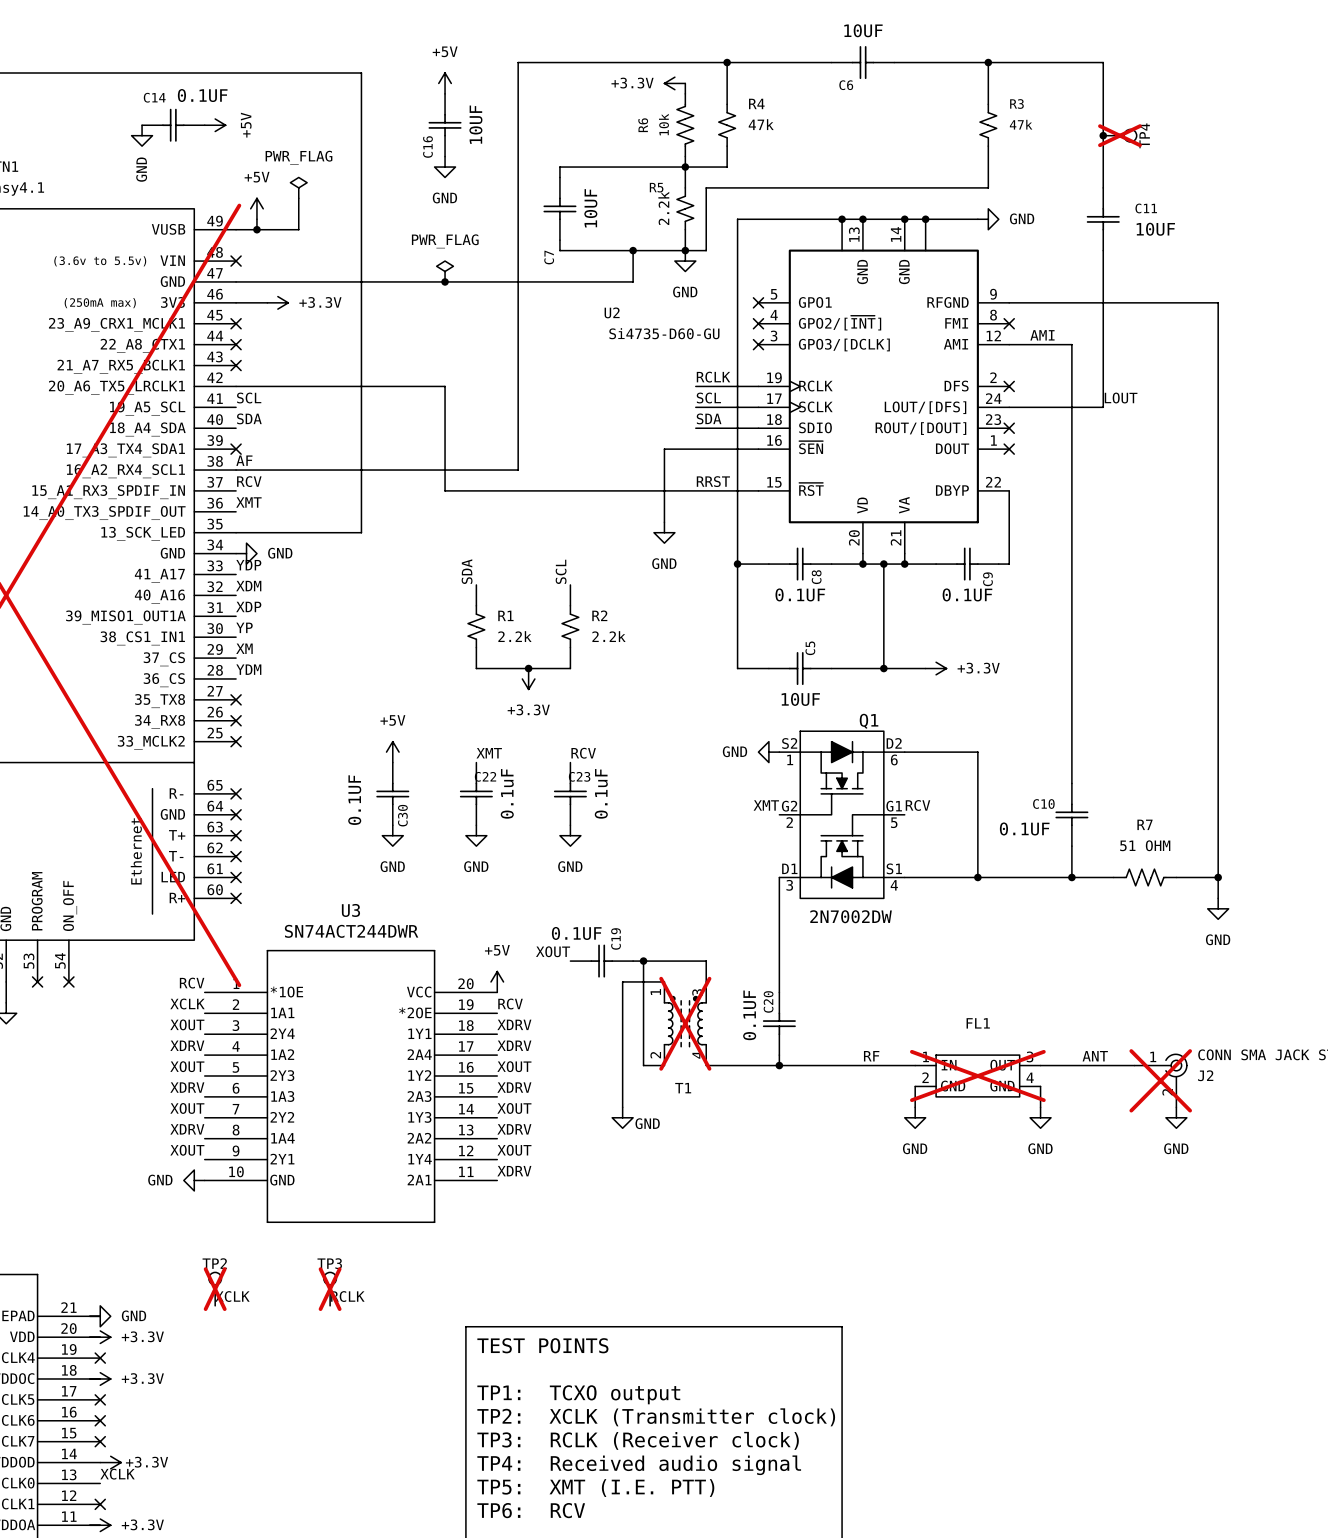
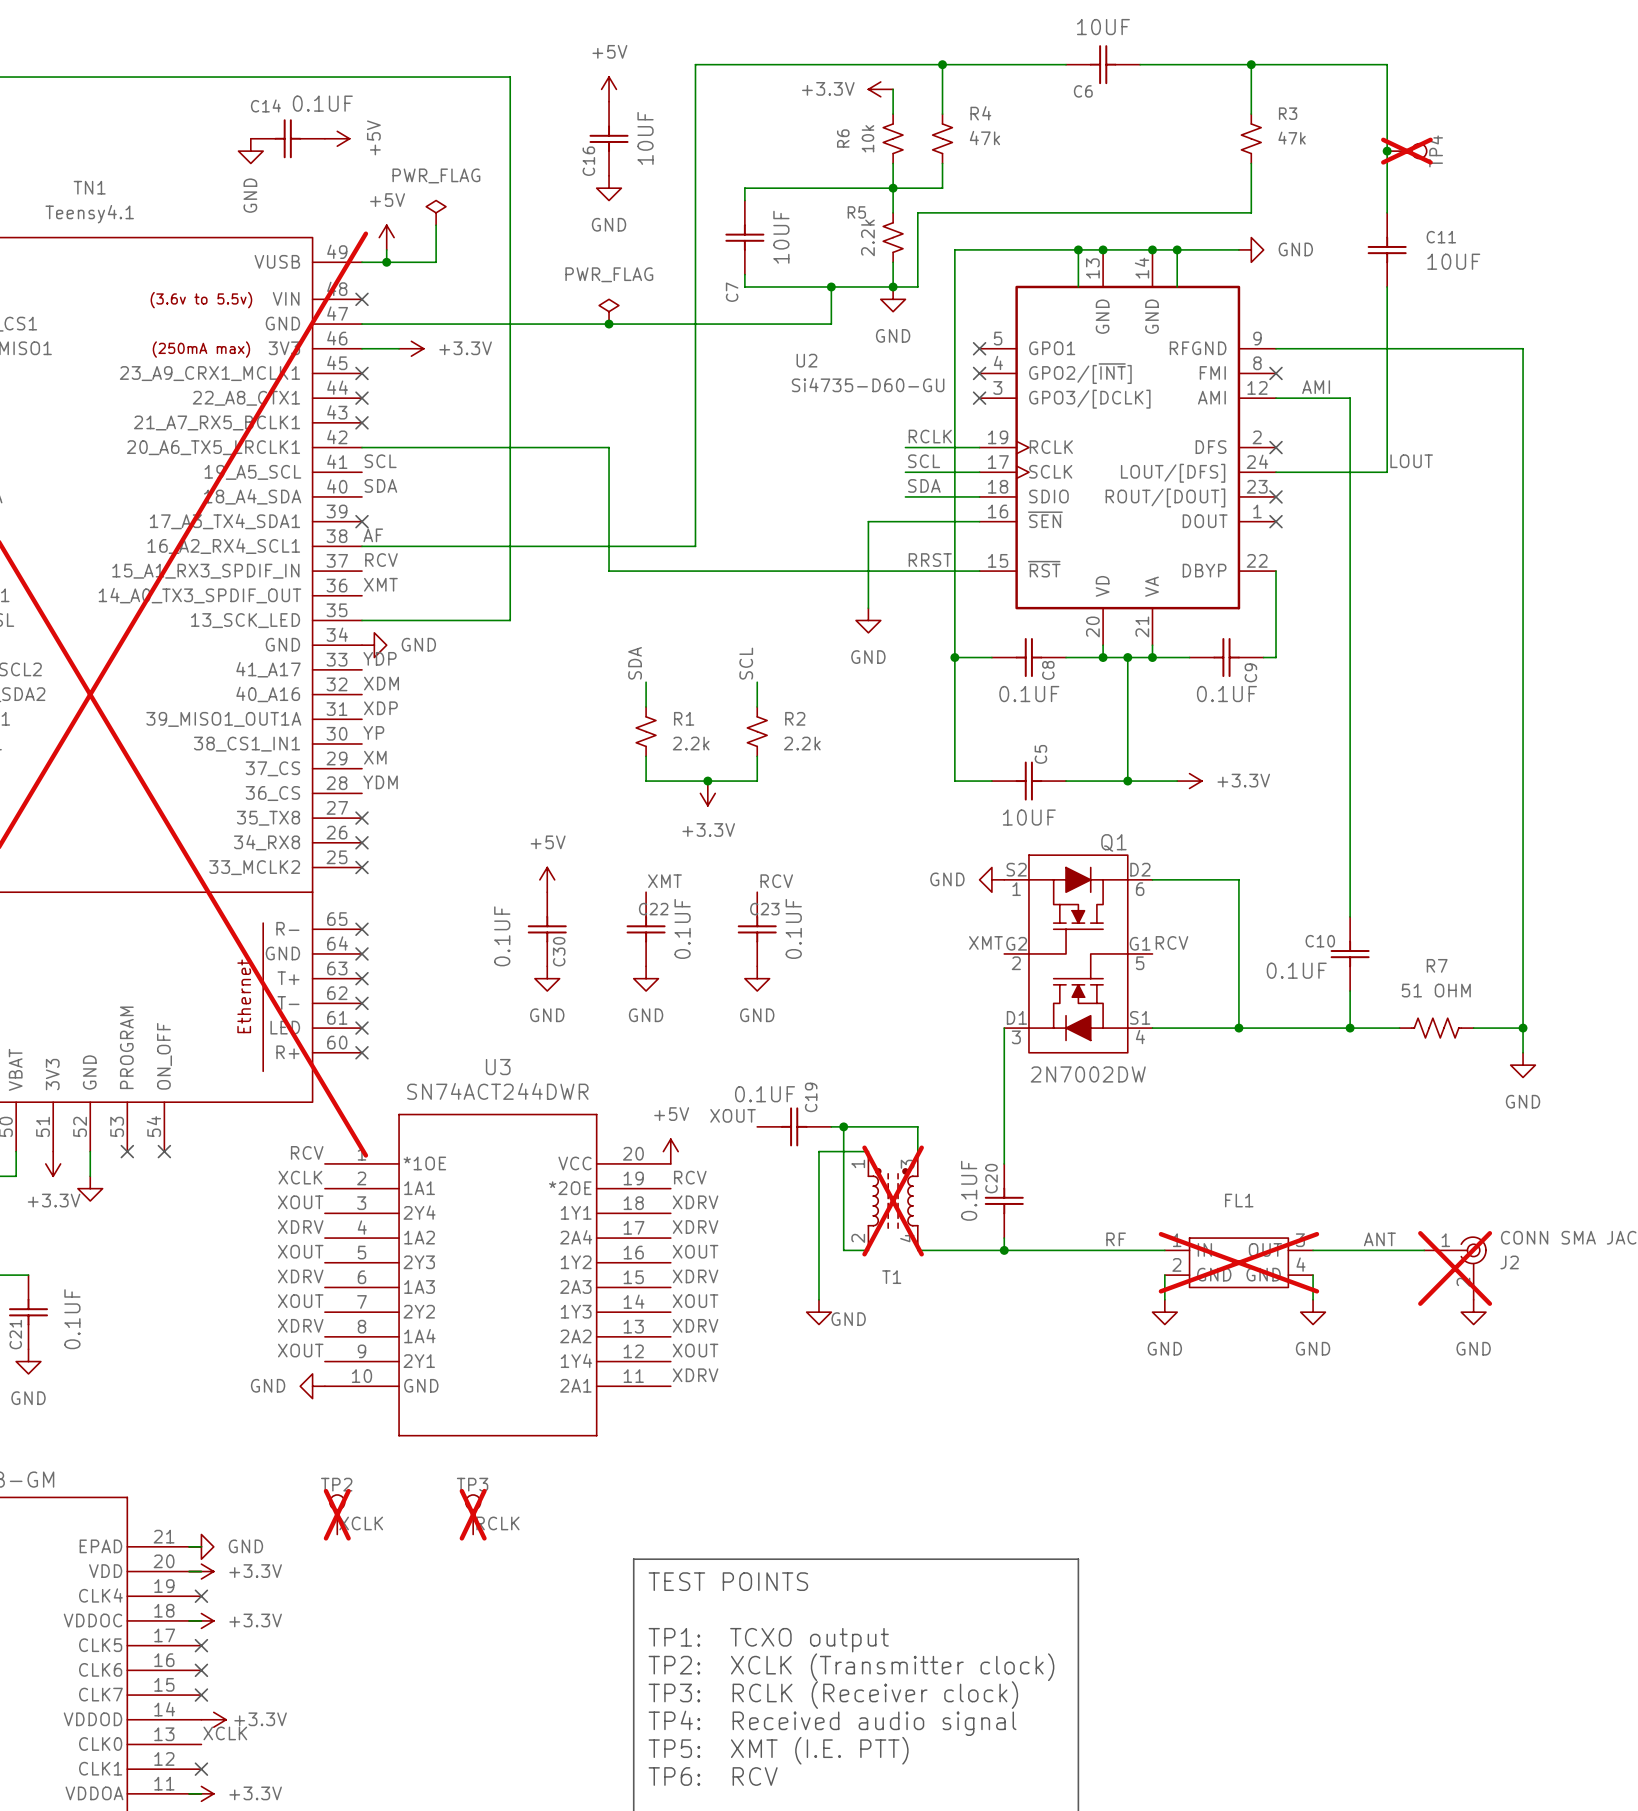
R6 symbol: [676, 93, 694, 157] -> [883, 114, 903, 164]
C22 value: 0.1uF (507, 793) -> 0.1UF (682, 928)
C23 value: 0.1uF (601, 793) -> 0.1UF (793, 928)

